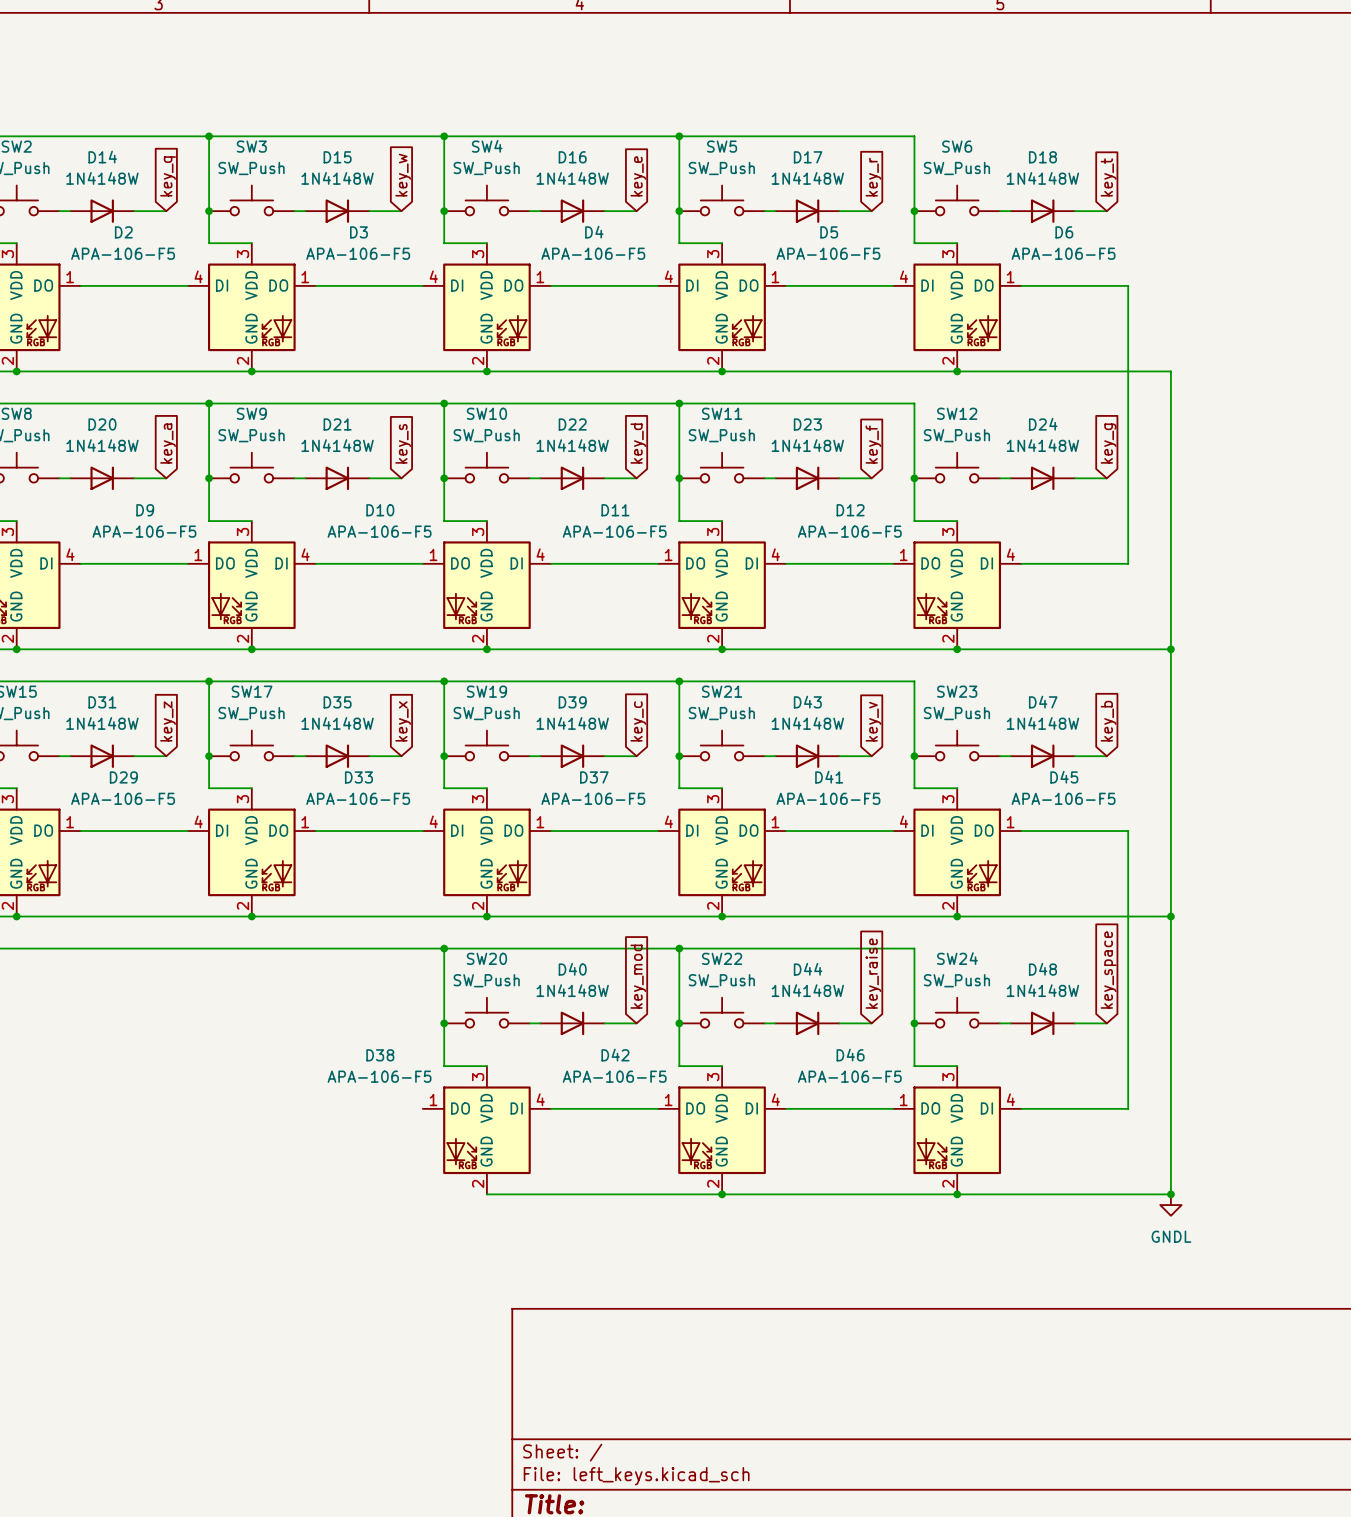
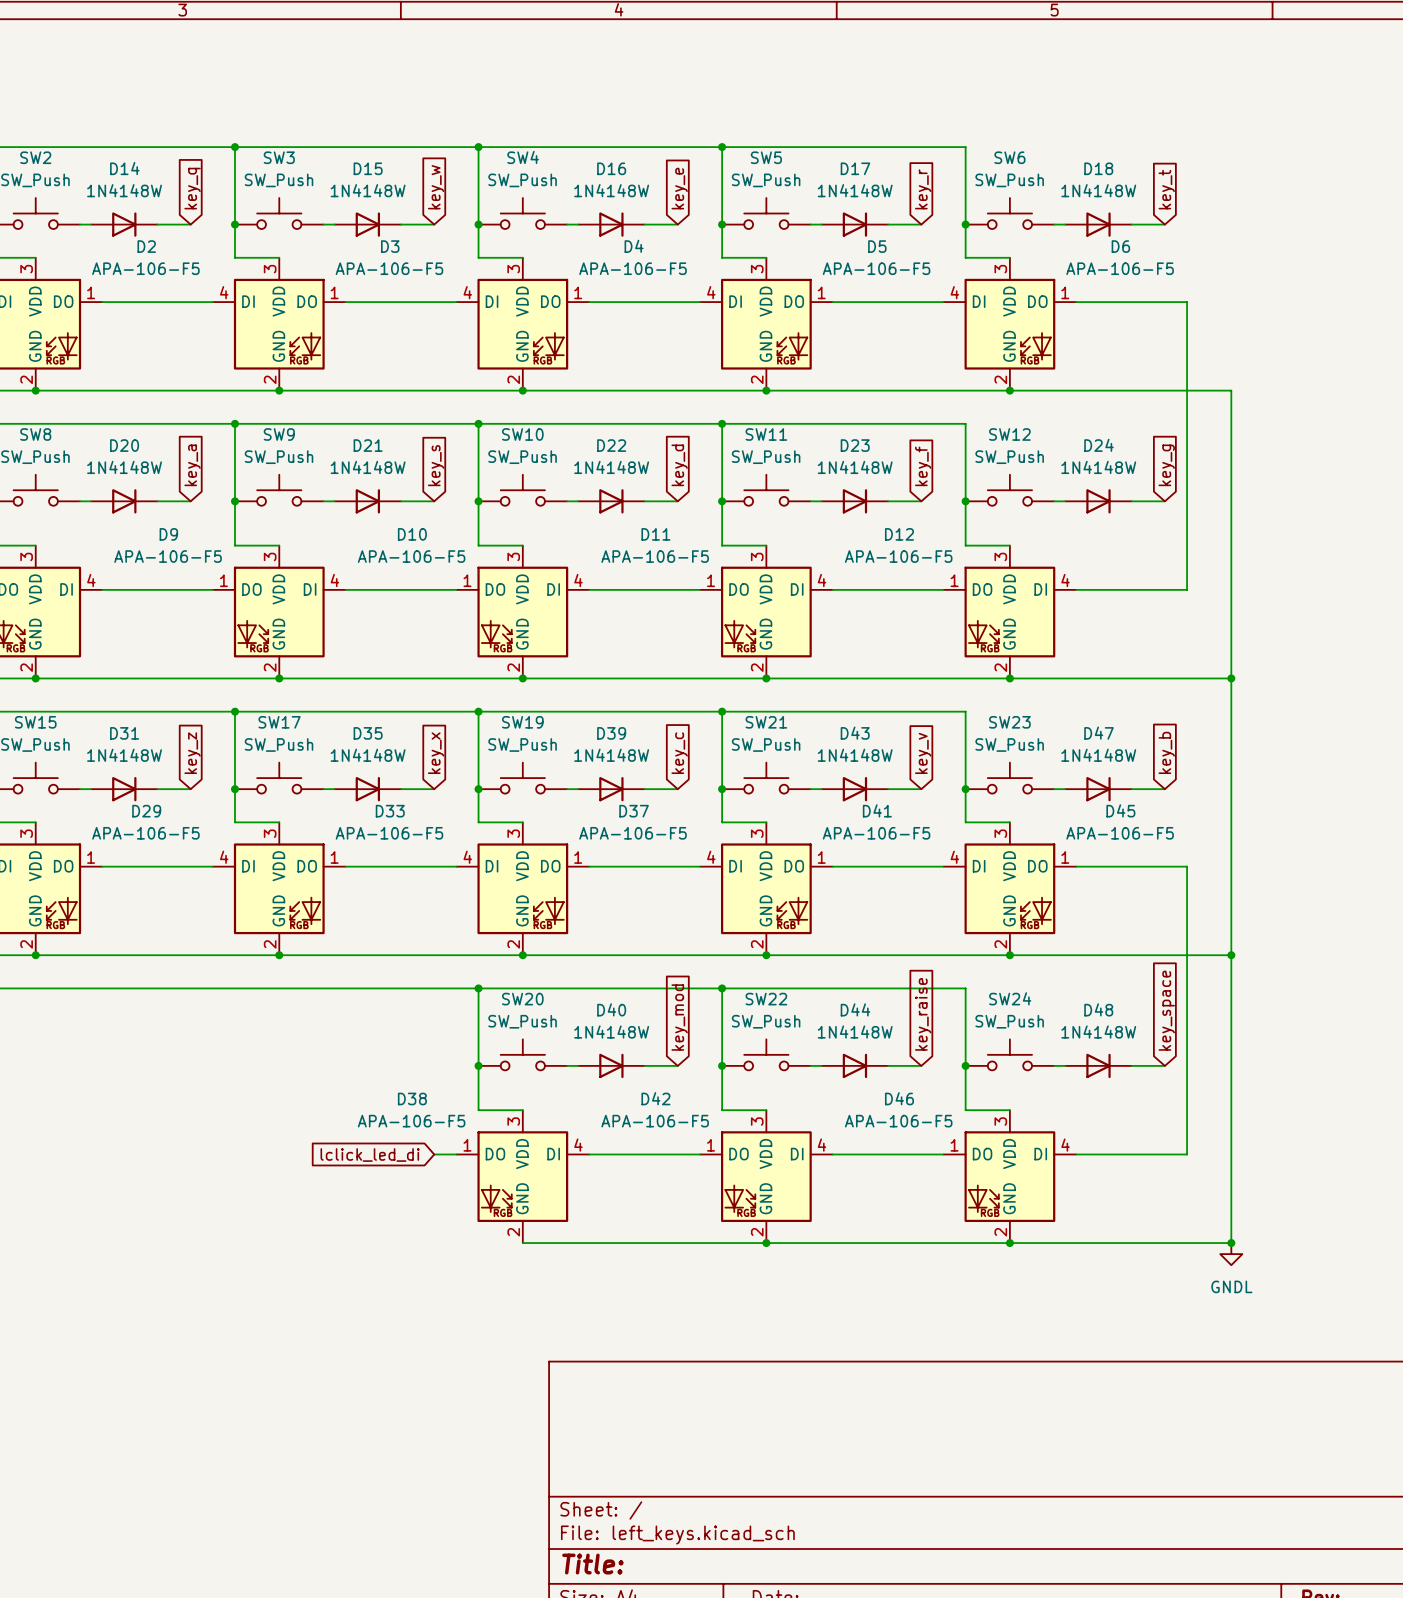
wire: none -> (434, 1154) (456, 1154)
global label: none -> lclick_led_di (370, 1155)

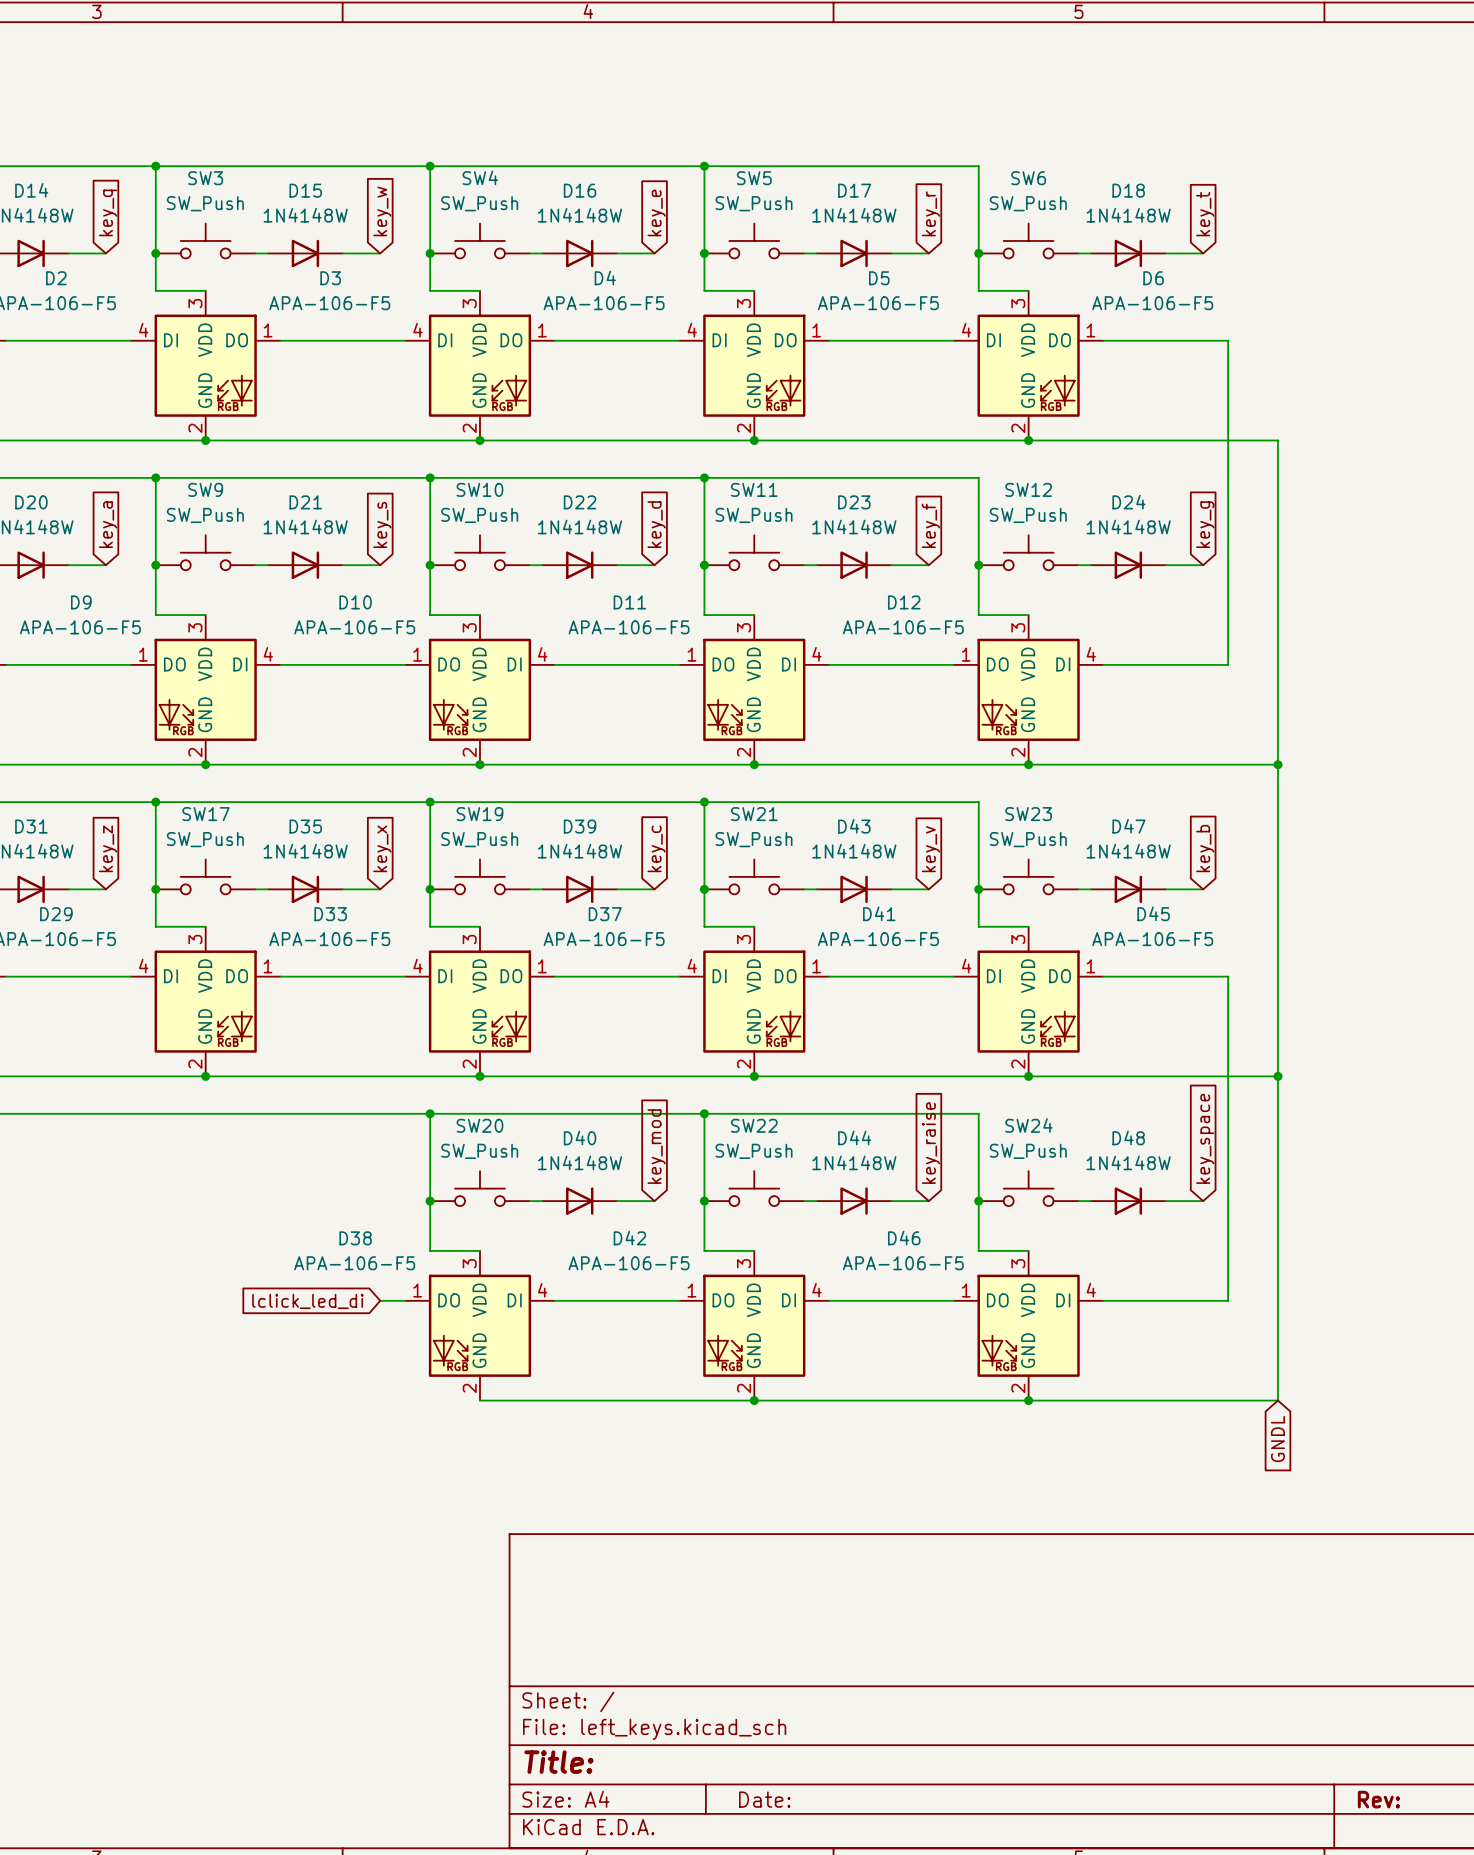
junction: (1231, 1243) -> none
power symbol: GNDL (1231, 1254) -> none
global label: none -> GNDL (1277, 1439)

